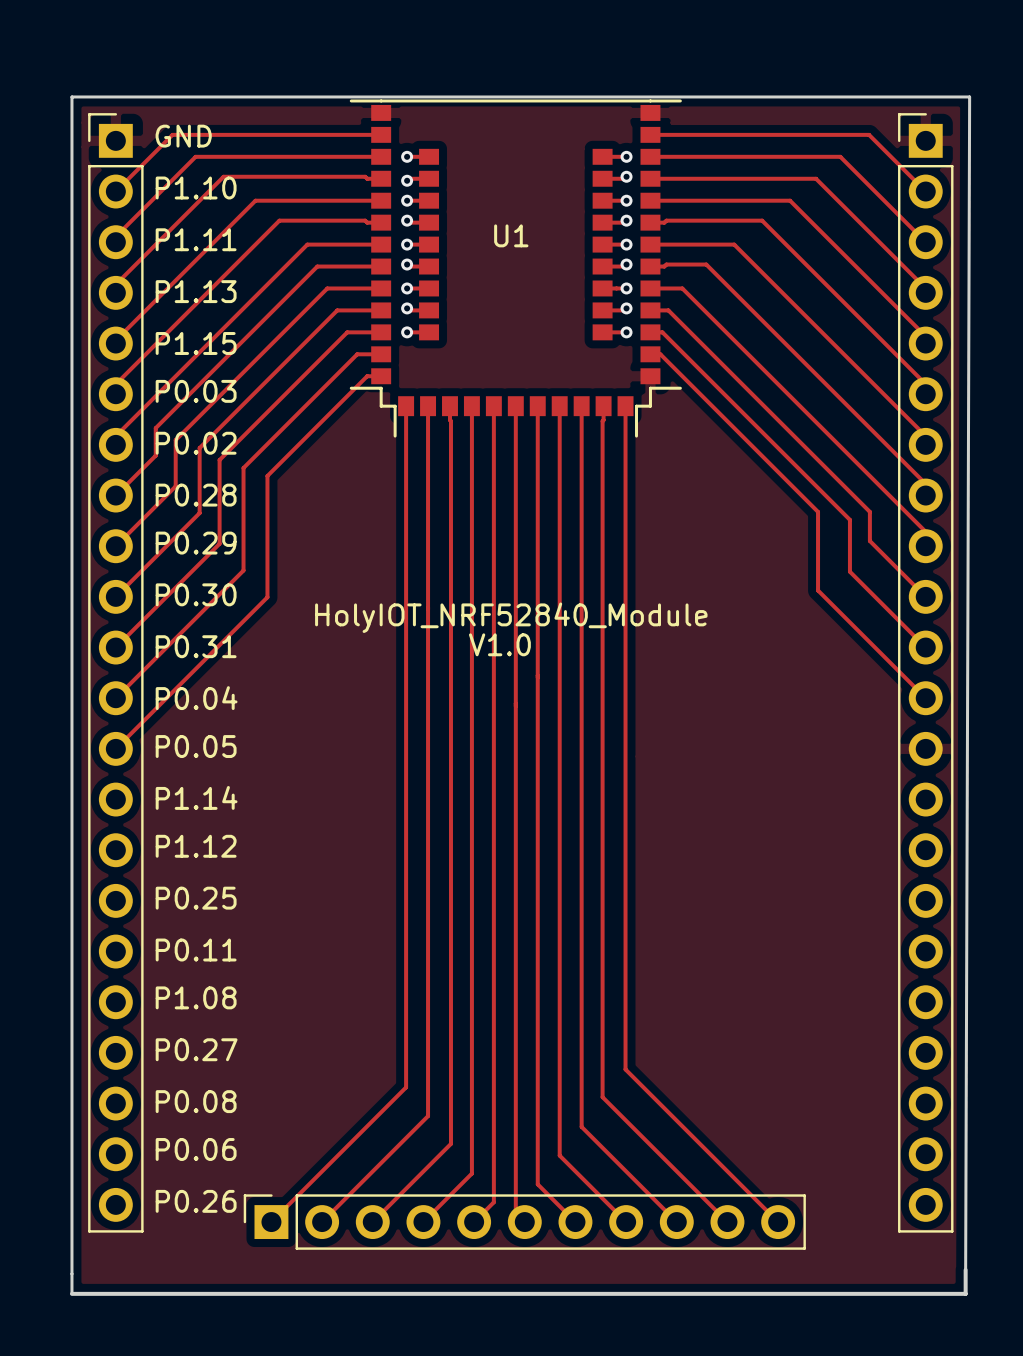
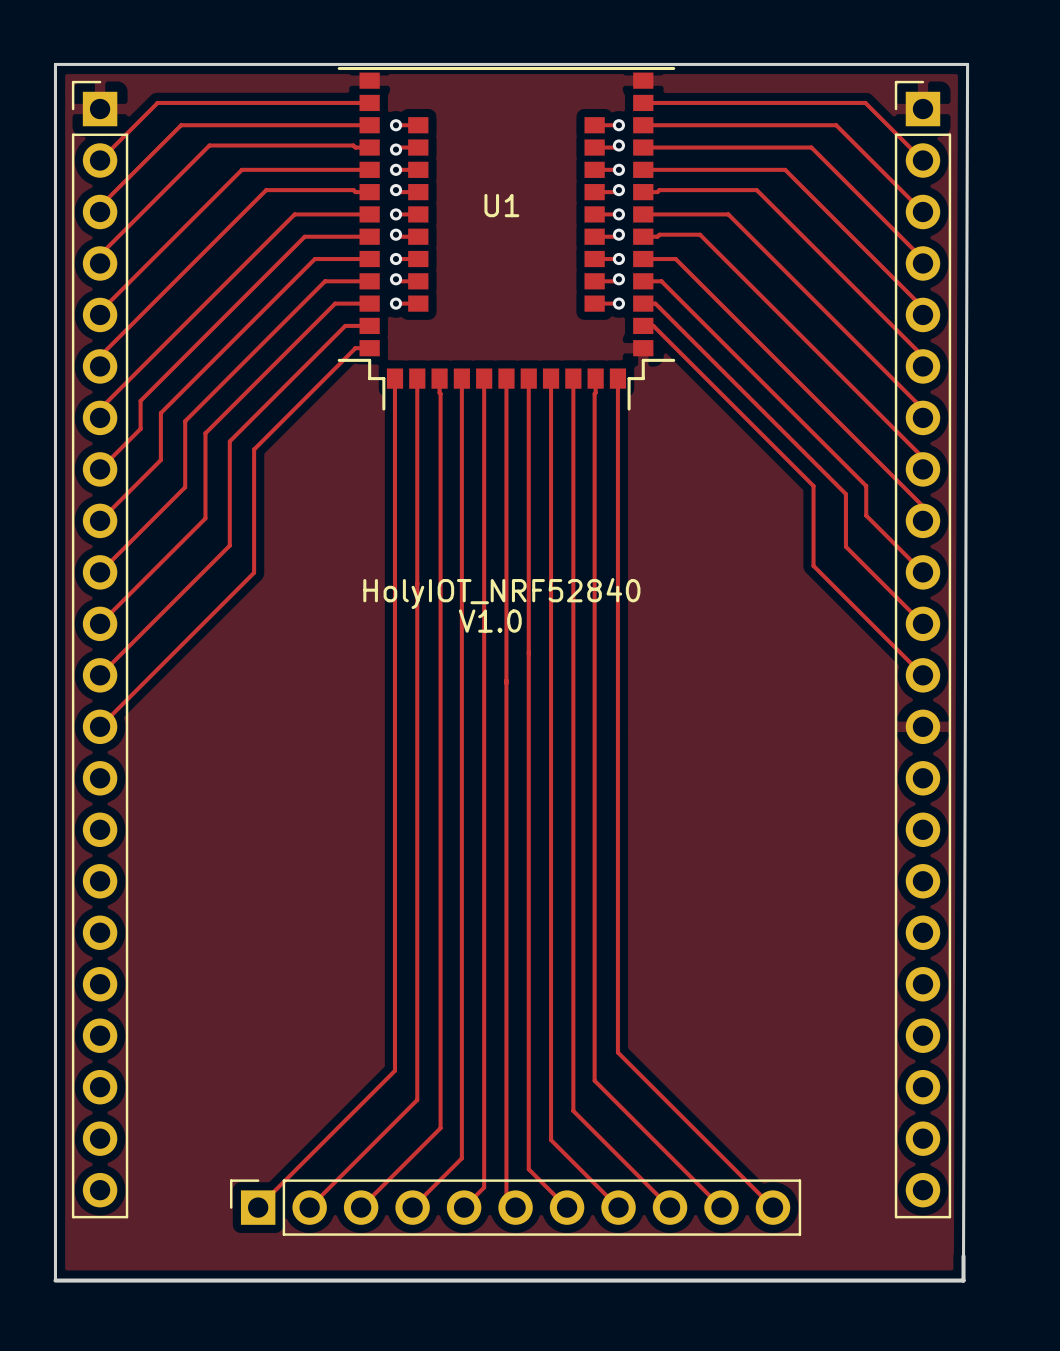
text: GND (183, 136) -> none
text: P1.10 (196, 187) -> none
text: P1.11 (196, 239) -> none
text: P1.13 (196, 291) -> none
text: P1.15 (196, 343) -> none
text: P0.03 (196, 391) -> none
text: P0.02 (196, 443) -> none
text: P0.28 (196, 495) -> none
text: P0.29 (196, 543) -> none
text: P0.30 (196, 594) -> none
U1 value: HolyIOT_NRF52840_Module (511, 617) -> HolyIOT_NRF52840 (501, 593)
text: P0.31 (196, 646) -> none
text: P0.04 (196, 698) -> none
text: P0.05 (196, 746) -> none
text: P1.14 (196, 797) -> none
text: P1.12 (196, 846) -> none
text: P0.25 (196, 898) -> none
text: P0.11 (196, 950) -> none
text: P1.08 (196, 997) -> none
text: P0.27 (196, 1049) -> none
text: P0.08 (196, 1101) -> none
text: P0.06 (196, 1149) -> none
text: P0.26 (196, 1201) -> none

